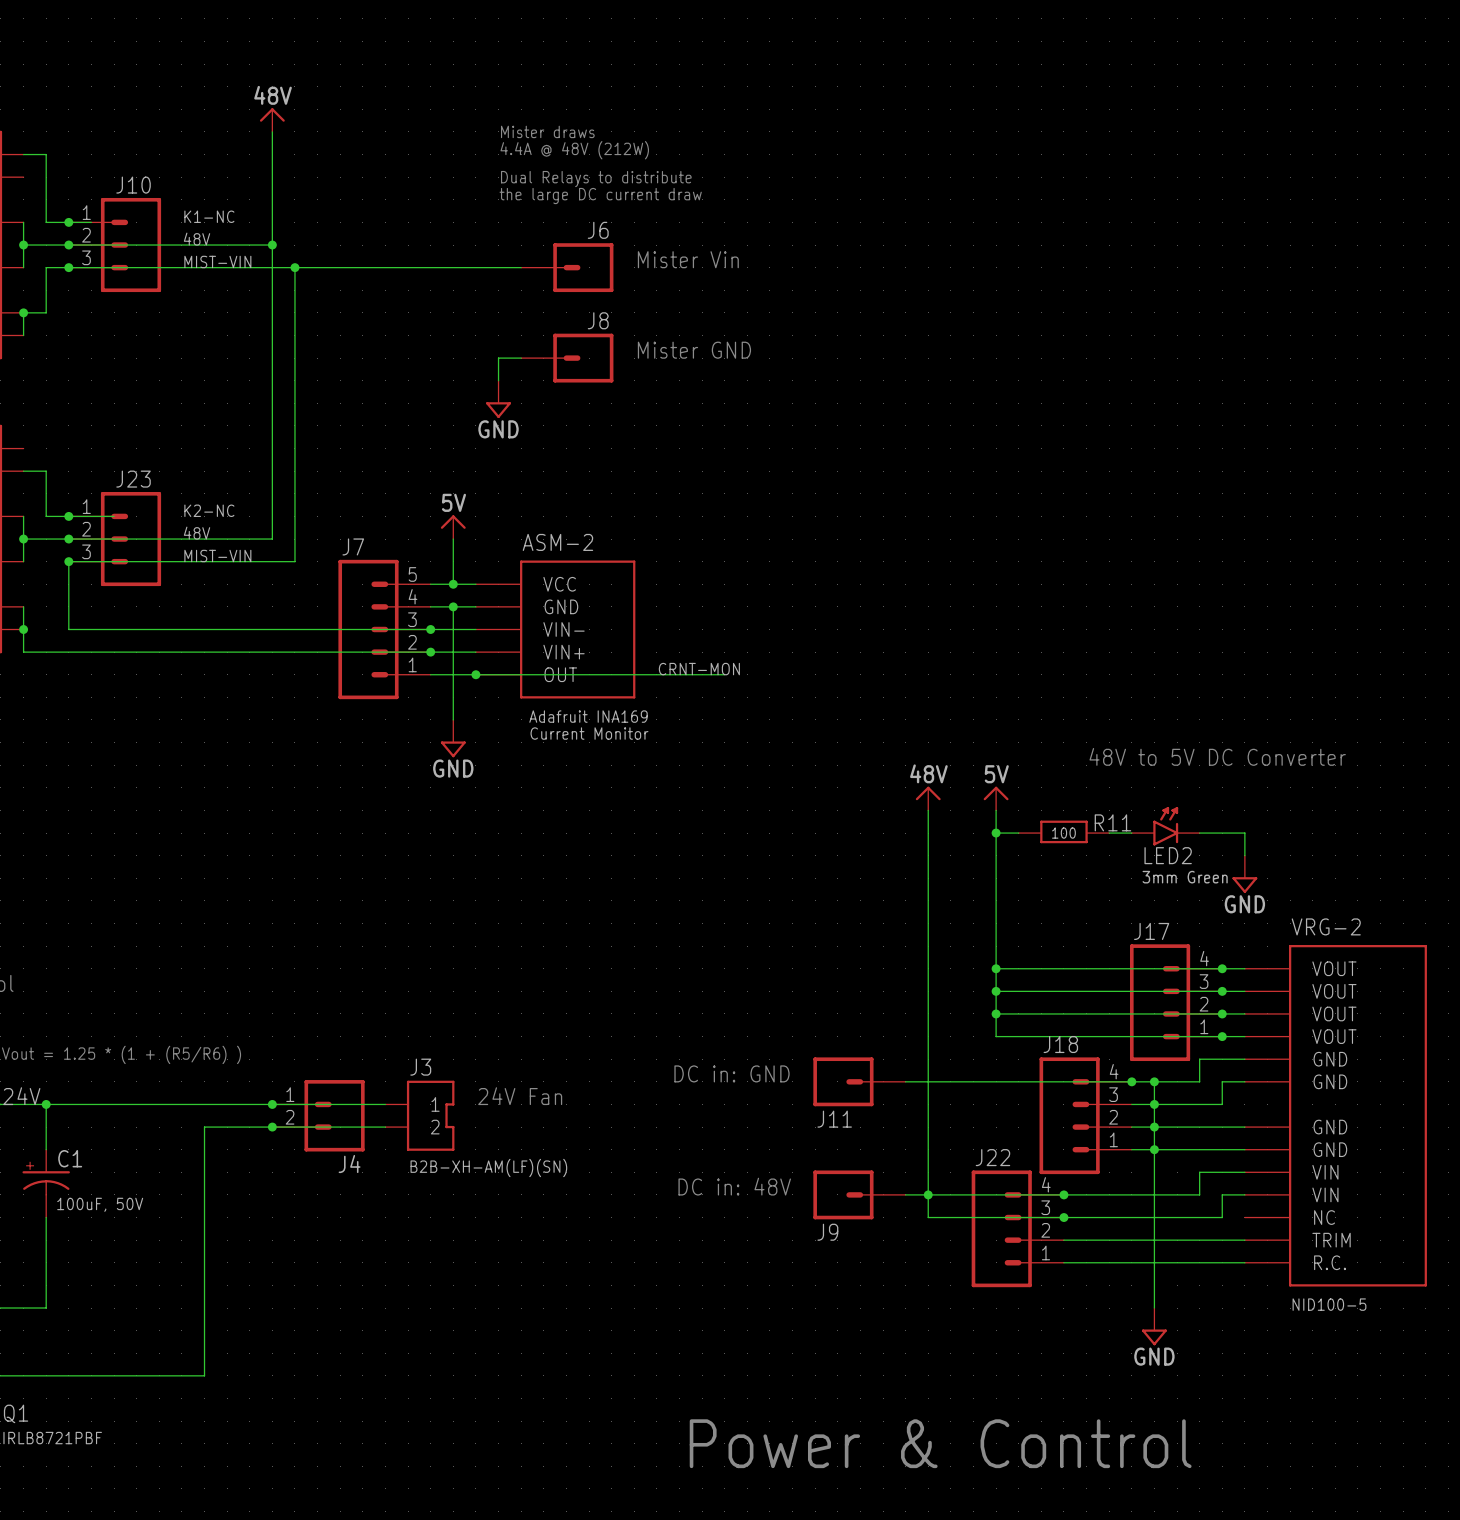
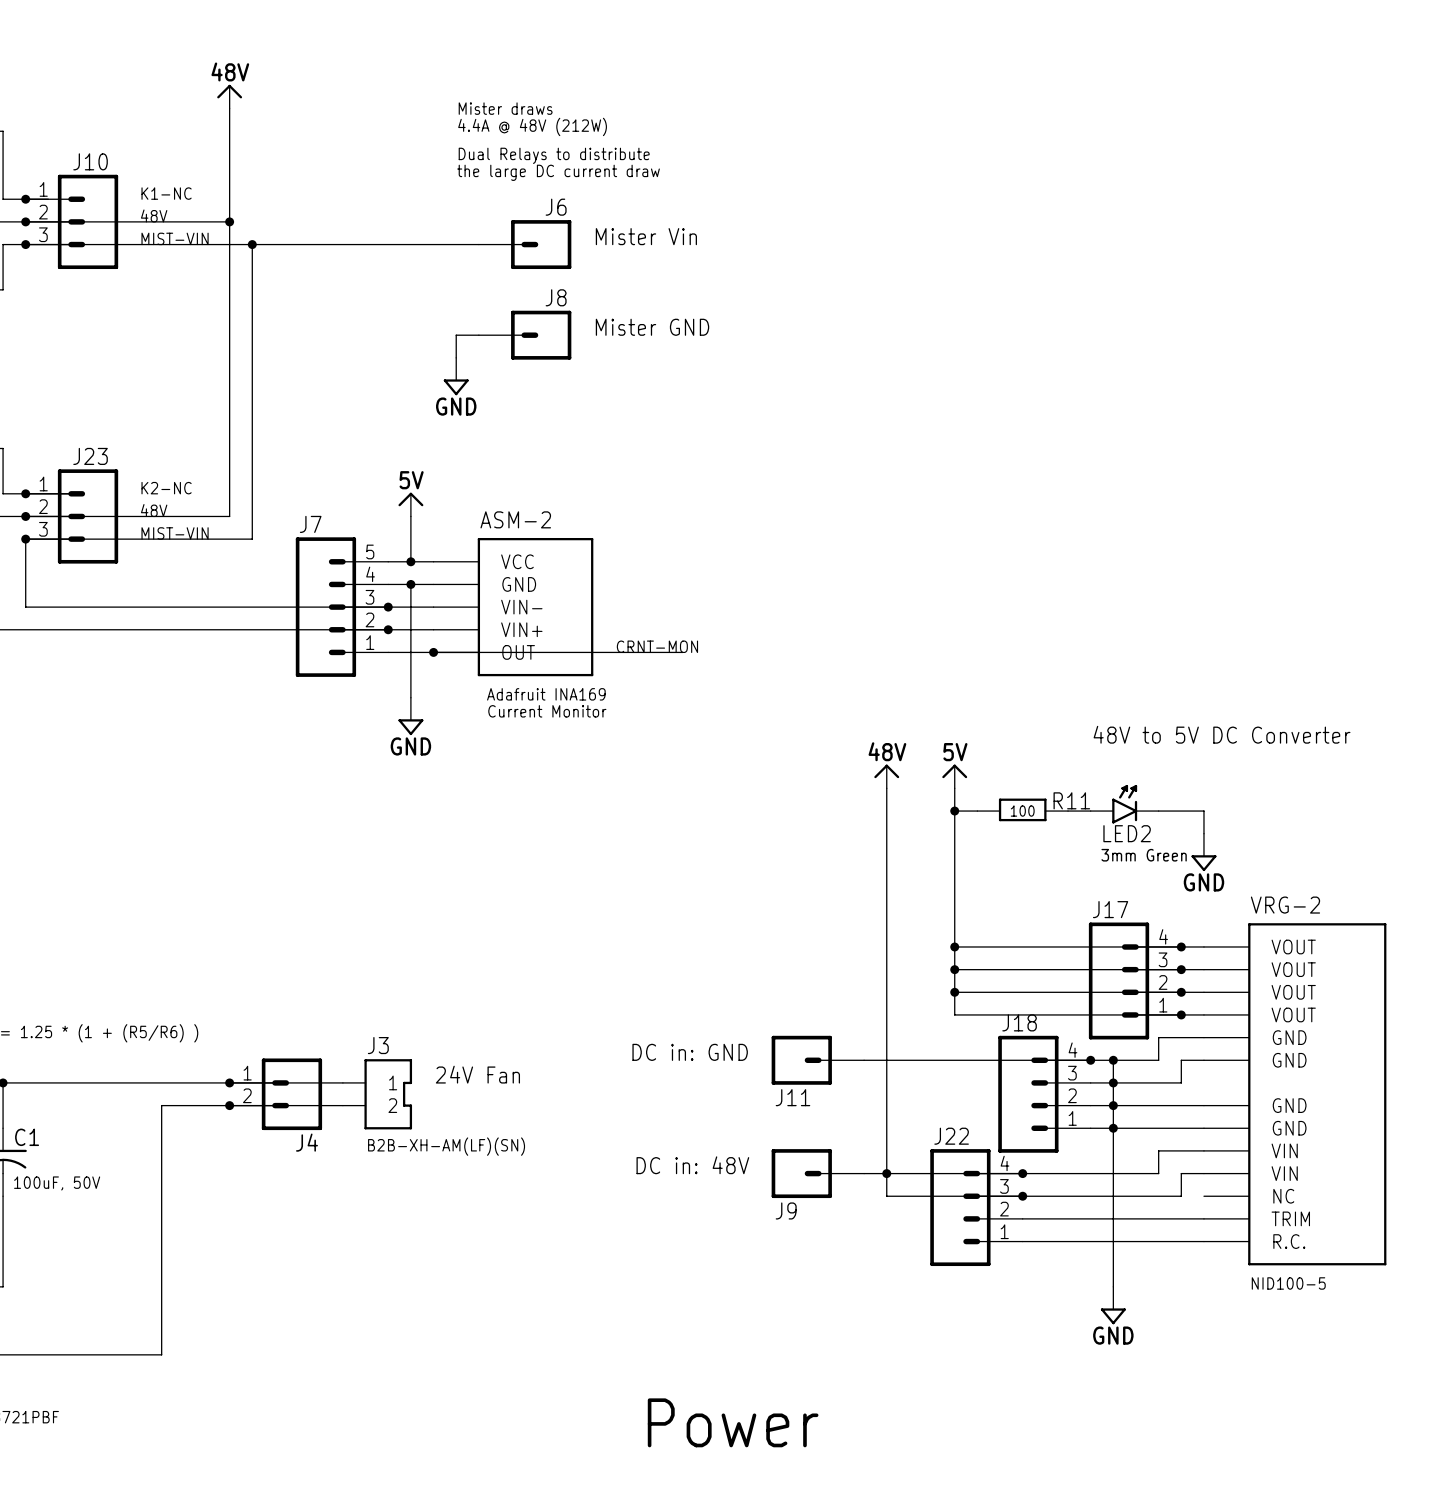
text position: 48V to 5V DC Converter (1217, 756) -> 48V to 5V DC Converter (1222, 734)
text: Power & Control (940, 1443) -> Power (733, 1422)

